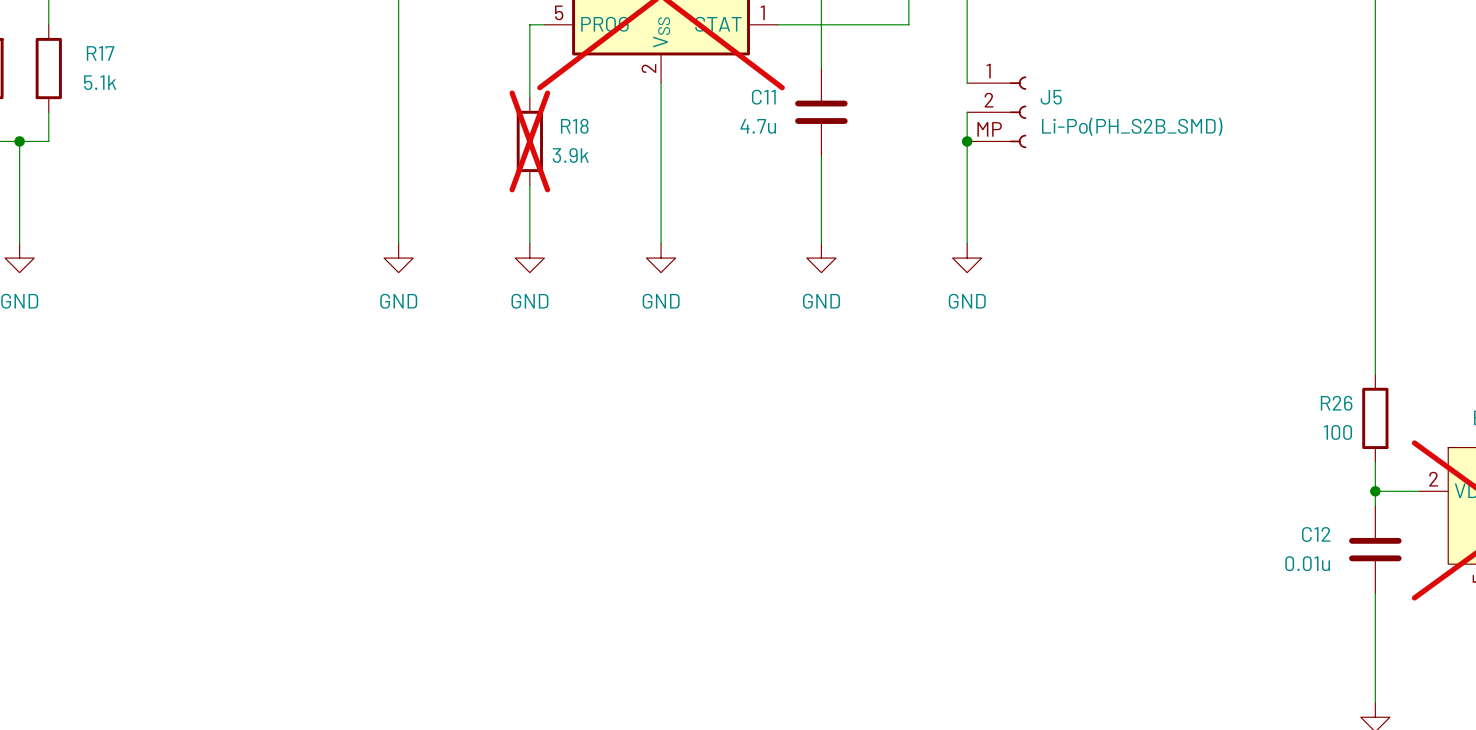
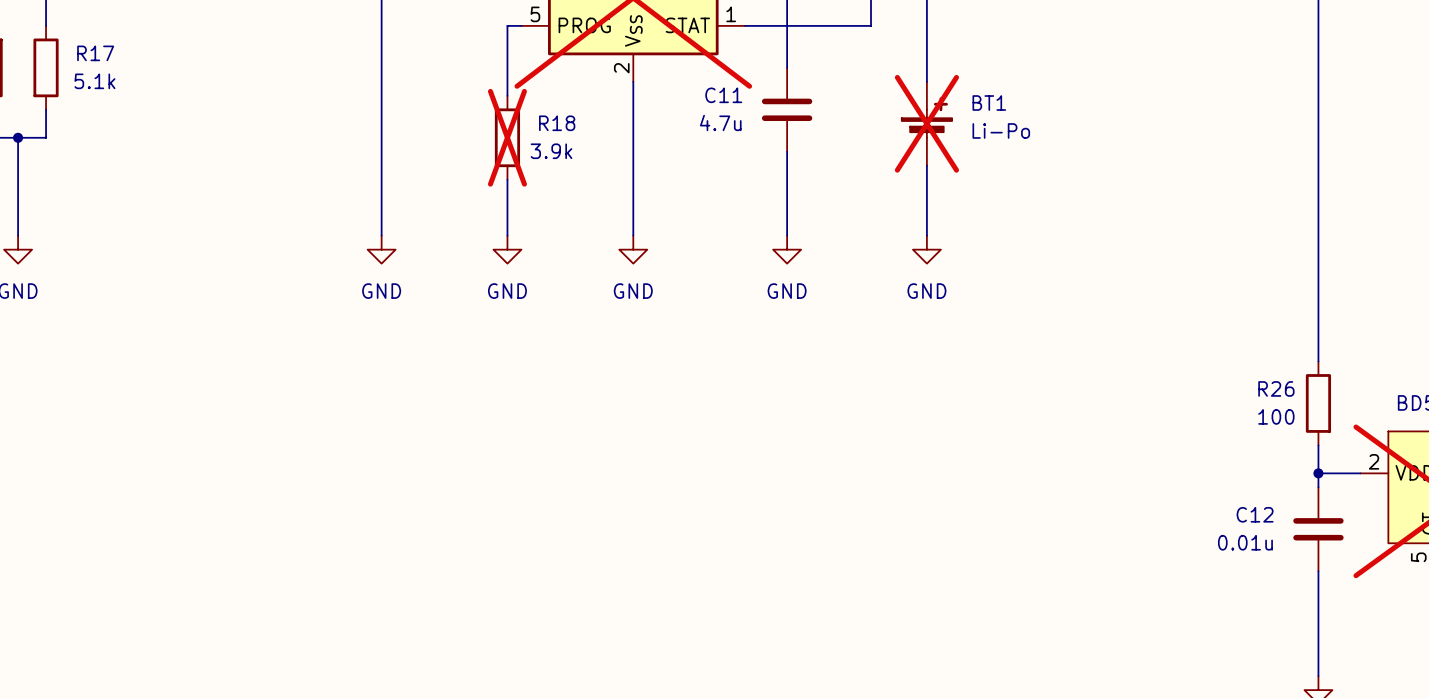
J5: Li-Po(PH_S2B_SMD) (996, 112) -> none
BT1: none -> Li-Po (926, 123)
junction: (967, 141) -> none

